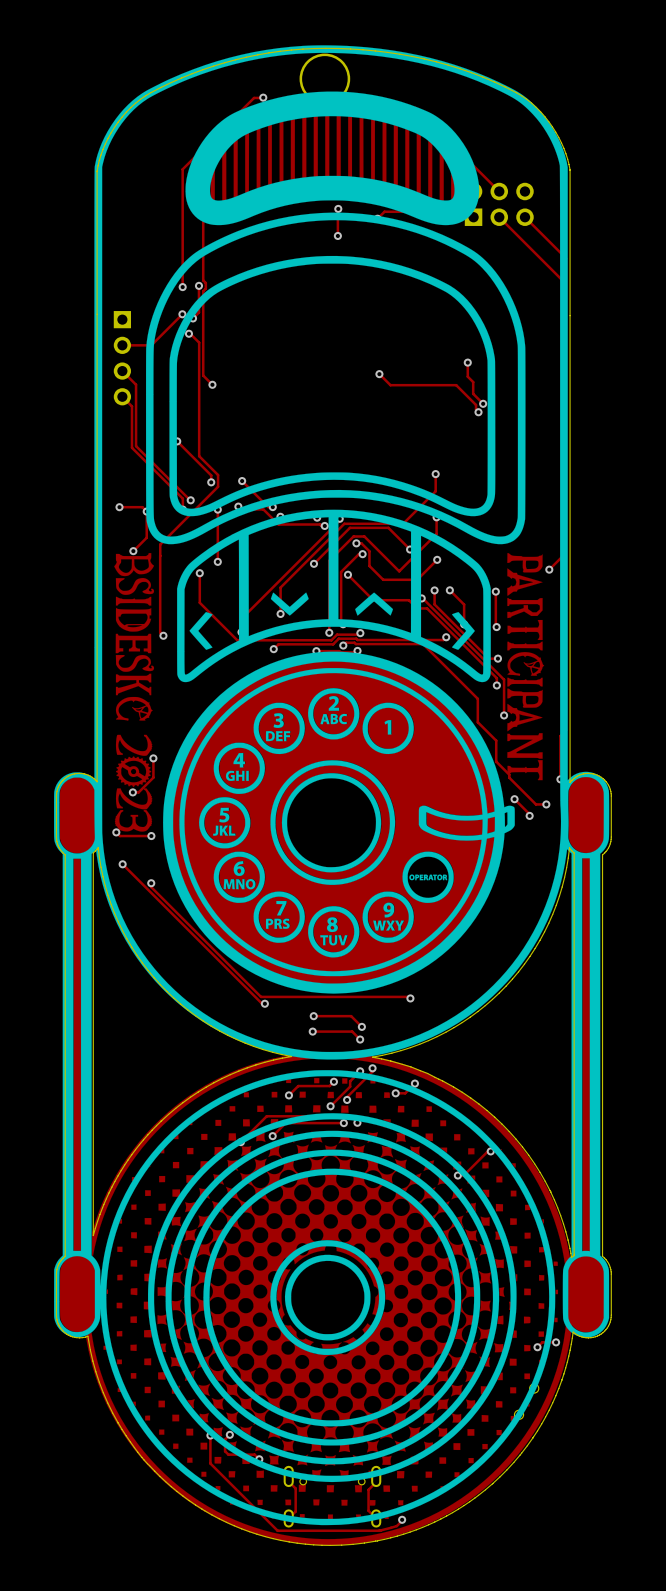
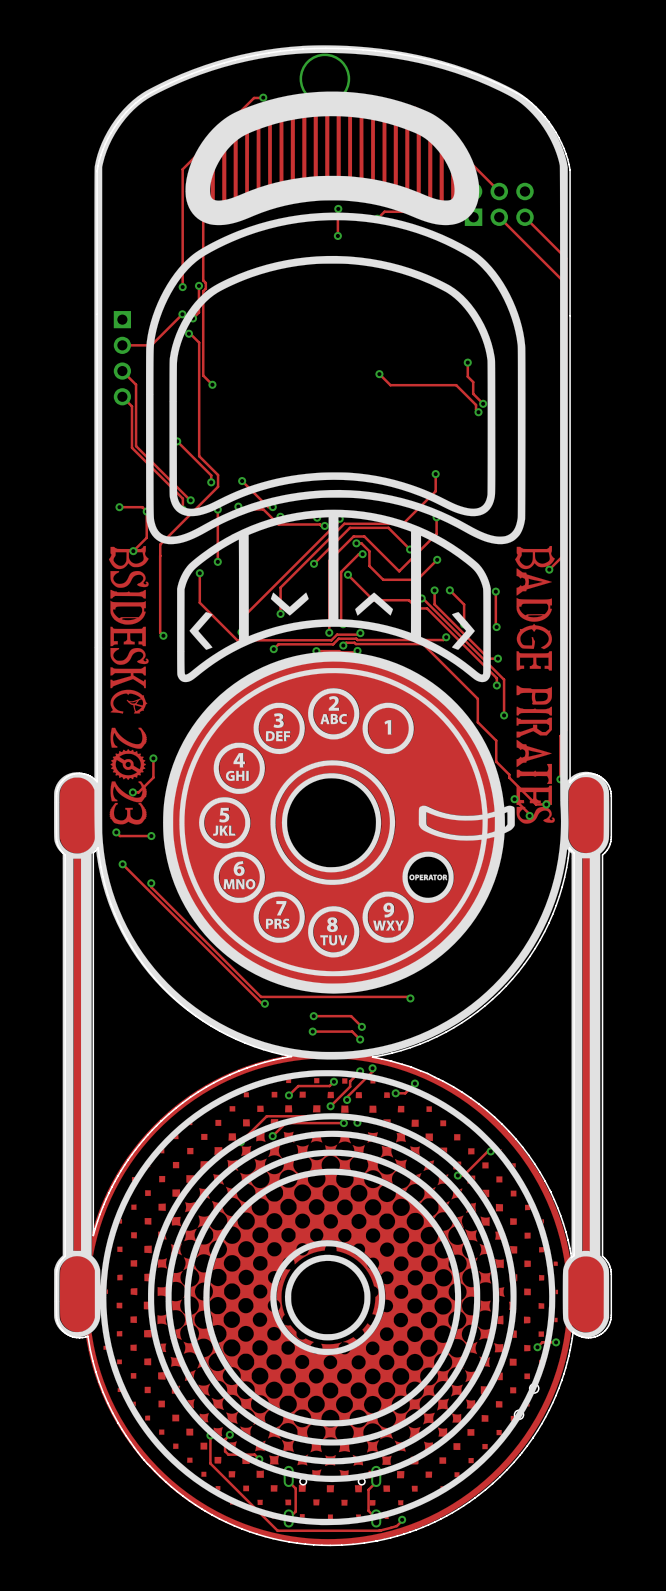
drawing shape: [114, 553, 545, 832] -> [108, 545, 555, 825]

